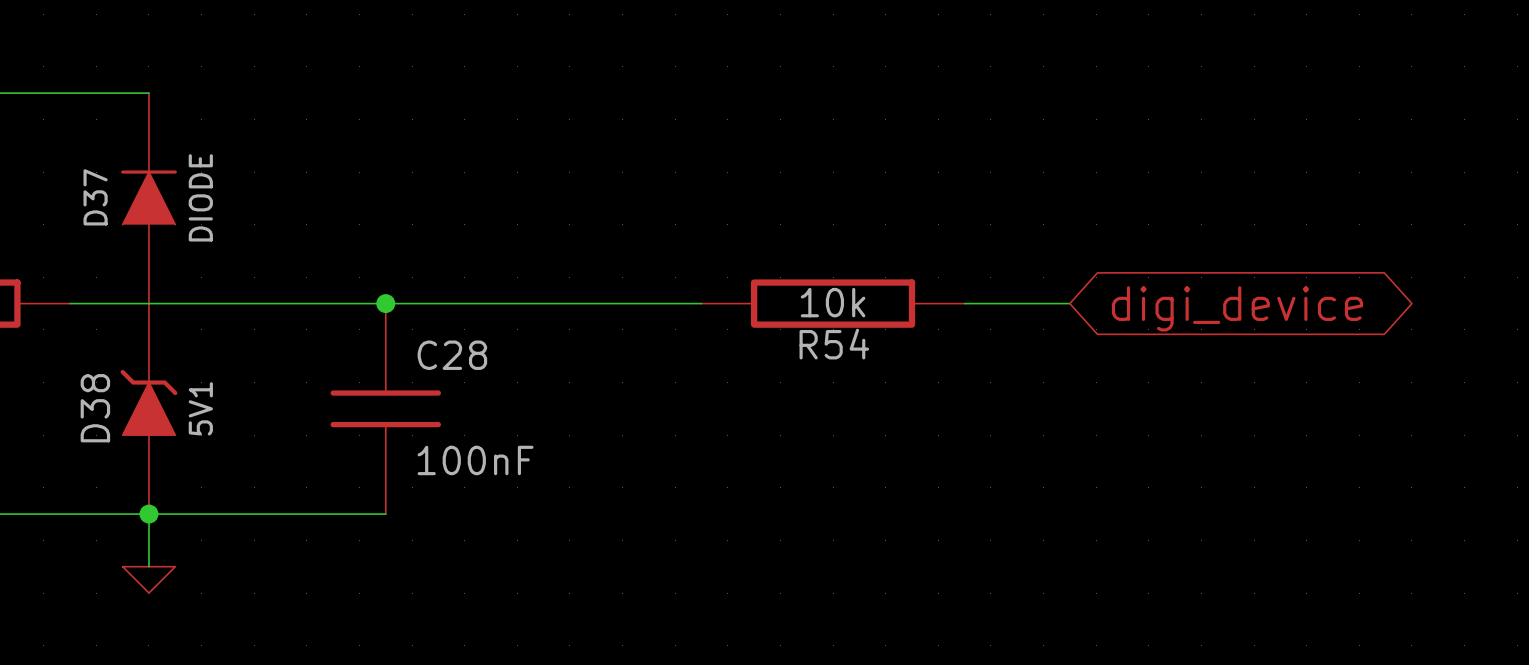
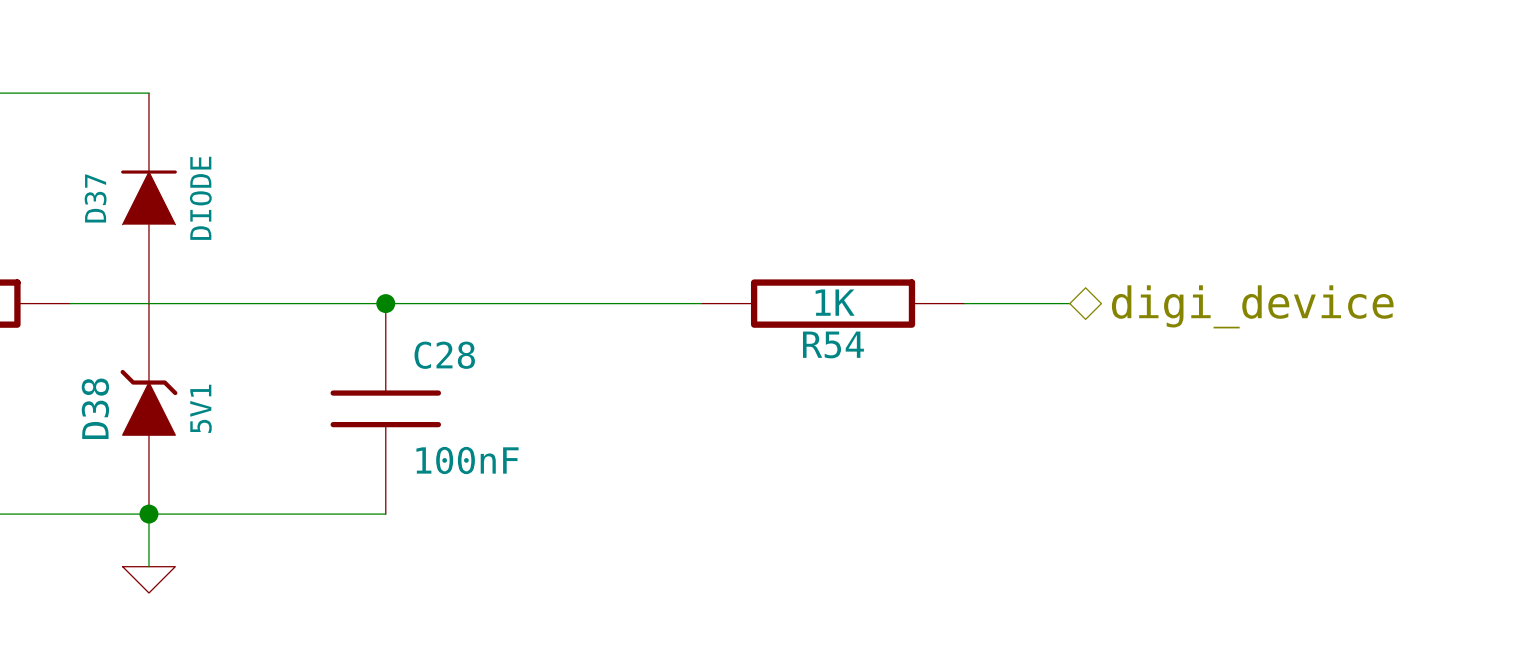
R54 value: 10k (833, 302) -> 1K (835, 302)
hierarchical label: none -> digi_device (1252, 306)
global label: digi_device (1237, 308) -> none

